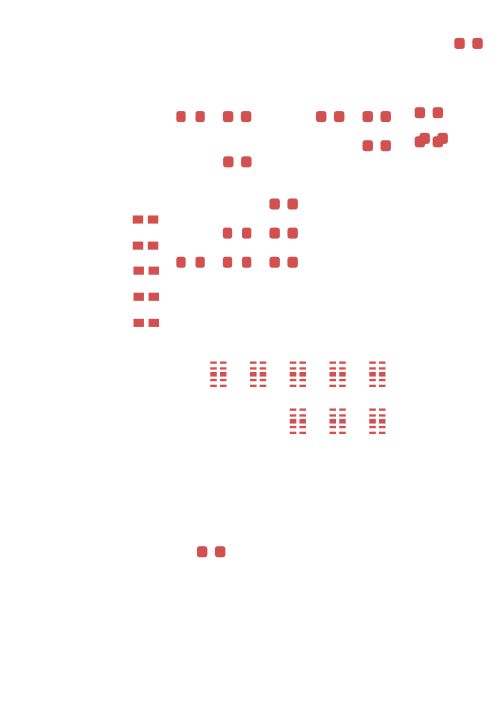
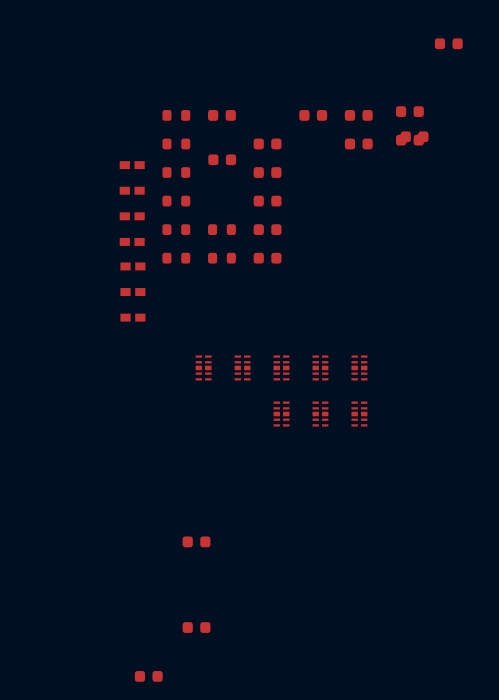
part: none -> (176, 143)
part: none -> (267, 143)
part: none -> (132, 165)
part: none -> (176, 172)
part: none -> (267, 172)
part: none -> (132, 190)
part: none -> (176, 201)
part: none -> (176, 229)
part: none -> (196, 627)
part: none -> (148, 676)

